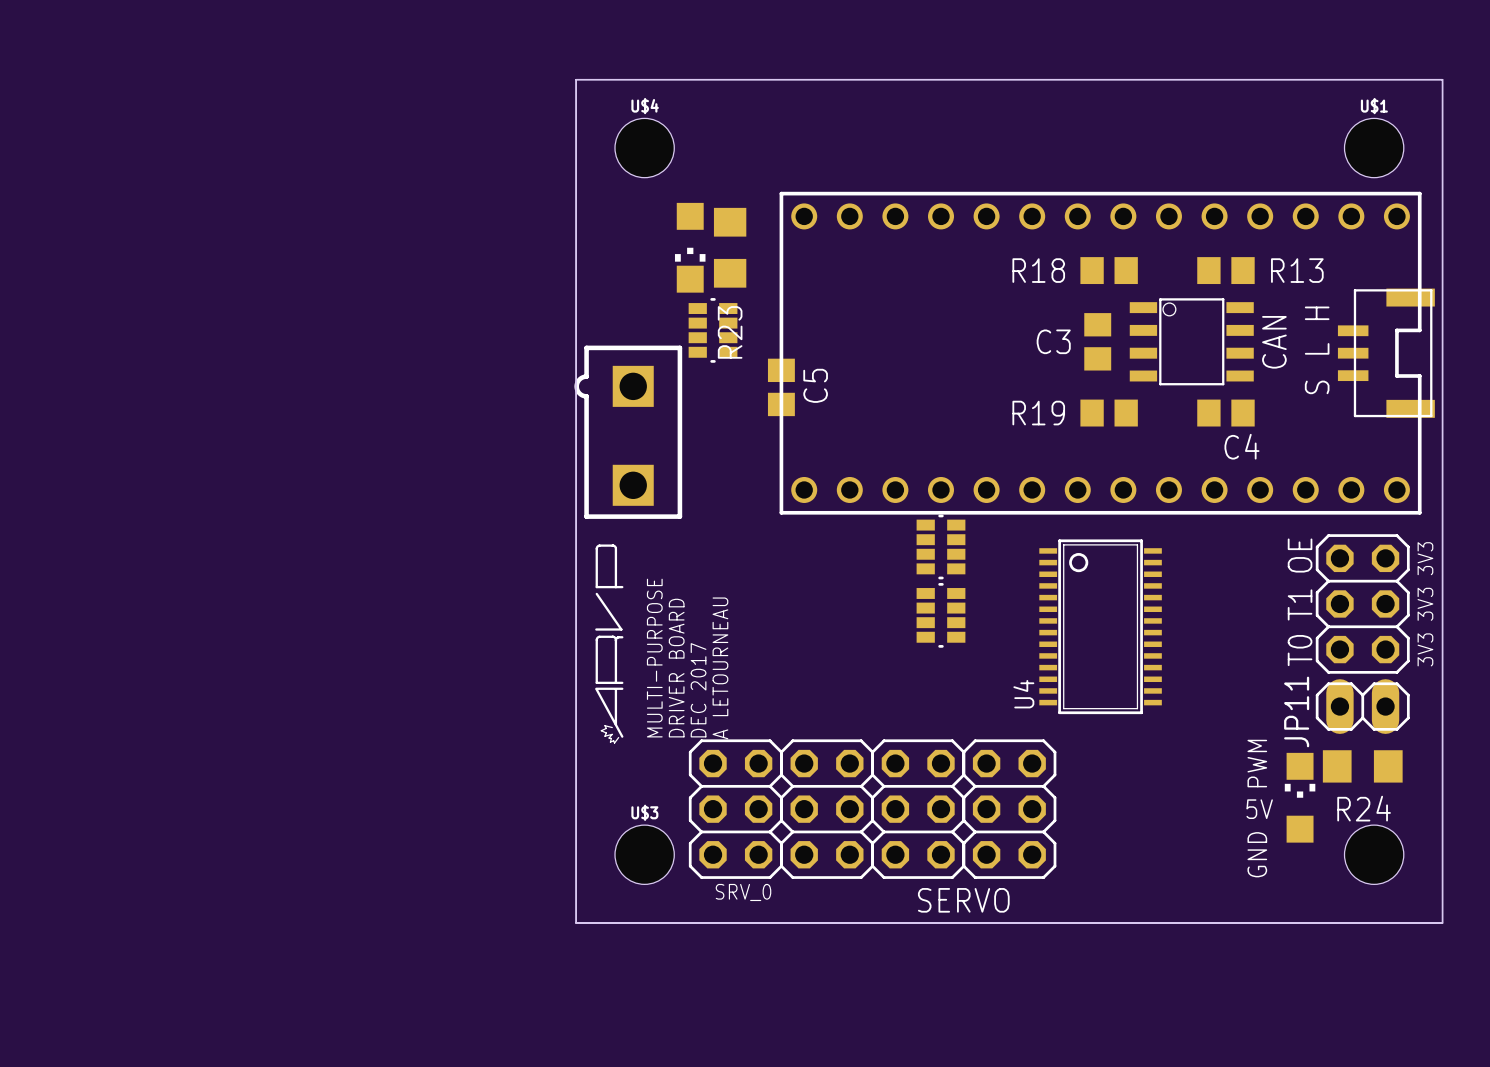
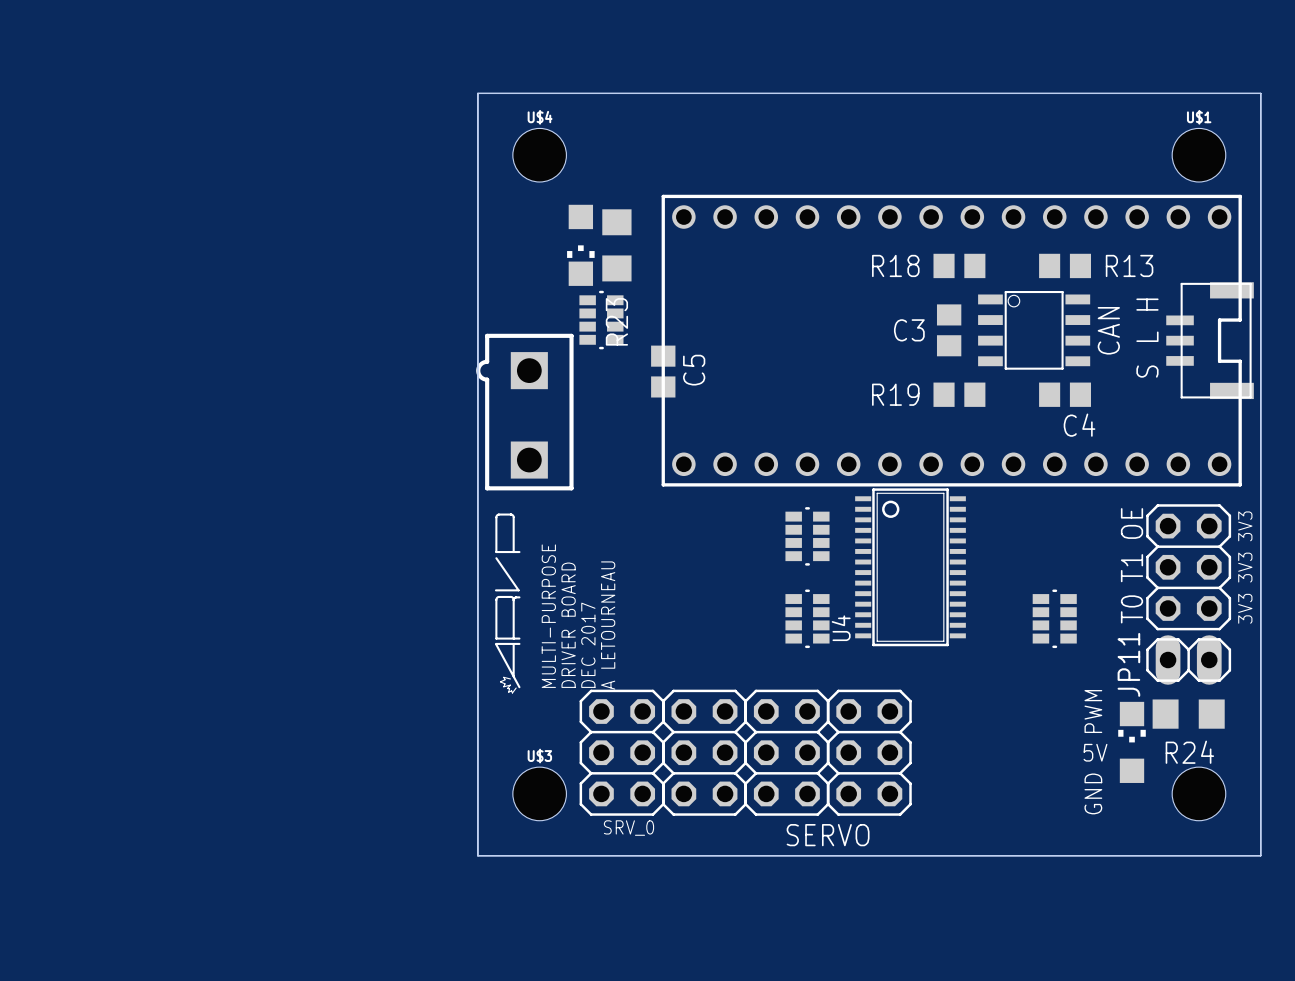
part: (941, 546) -> none
part: none -> (807, 536)
part: (941, 615) -> none
U4 position: (1100, 626) -> (910, 567)
part: none -> (807, 618)
part: none -> (1054, 618)

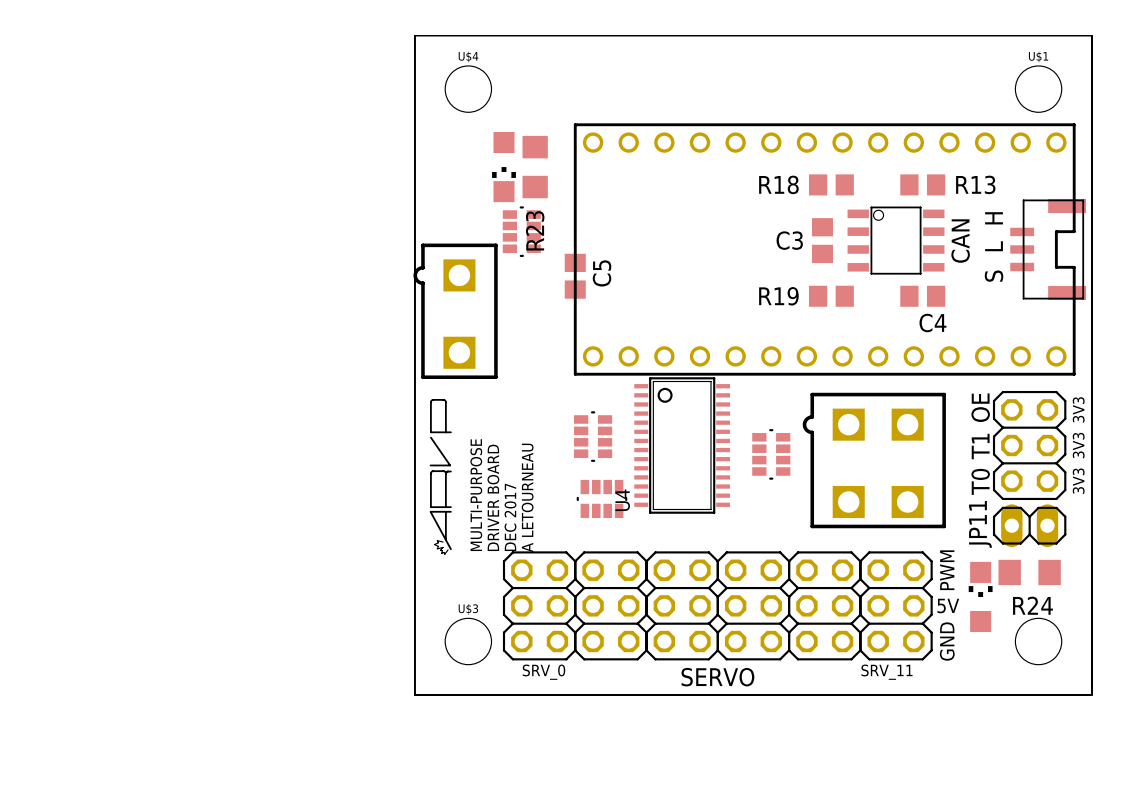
part: (807, 536) -> none
part: none -> (593, 436)
U4 position: (910, 567) -> (682, 445)
part: none -> (771, 454)
part: none -> (874, 460)
part: (807, 618) -> none
part: (1054, 618) -> none
part: none -> (602, 498)
part: none -> (824, 605)
part: none -> (896, 605)
text: none -> SRV_11 (886, 672)

